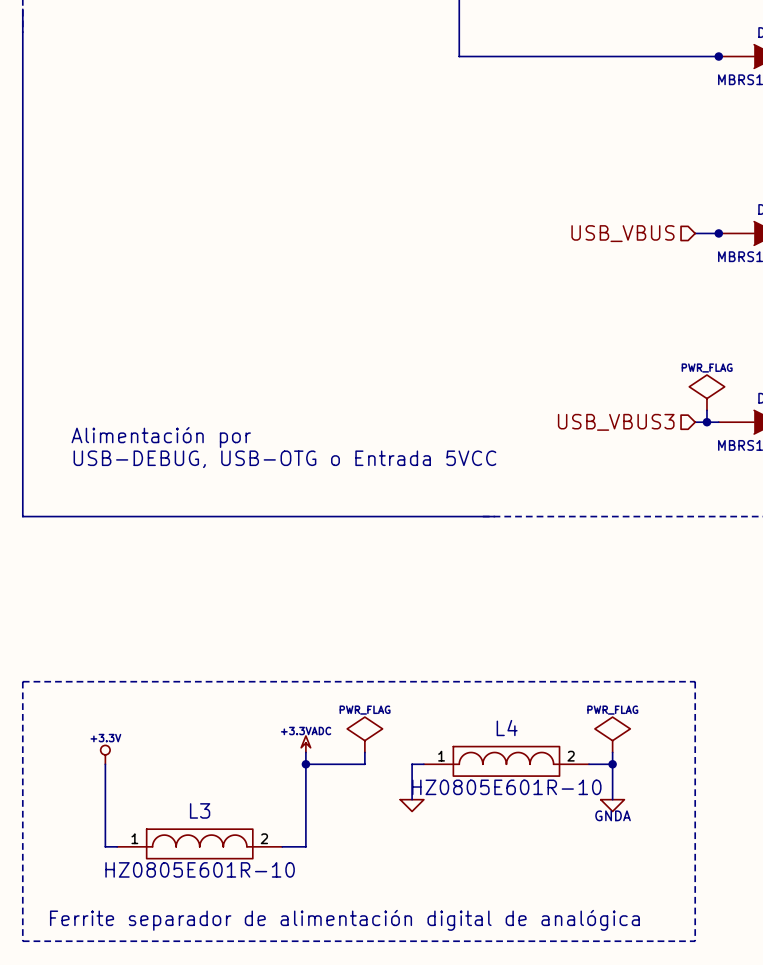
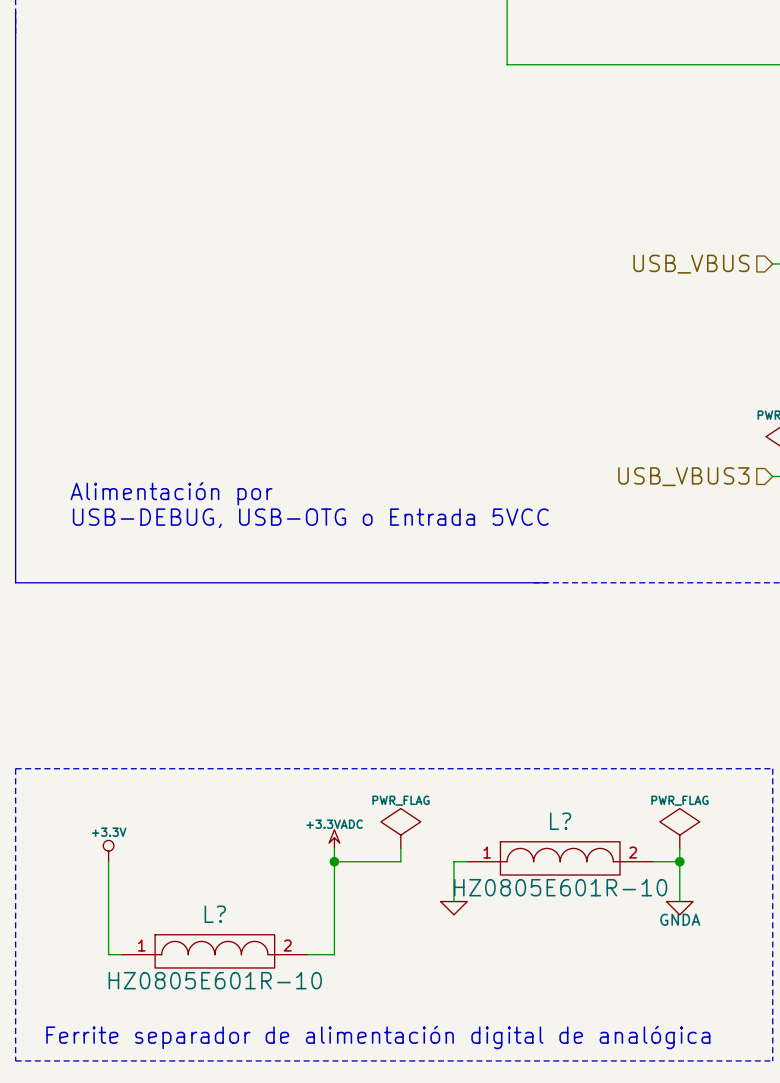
L4 name: L4 (507, 728) -> L? (560, 821)
L3 name: L3 (200, 810) -> L? (215, 914)

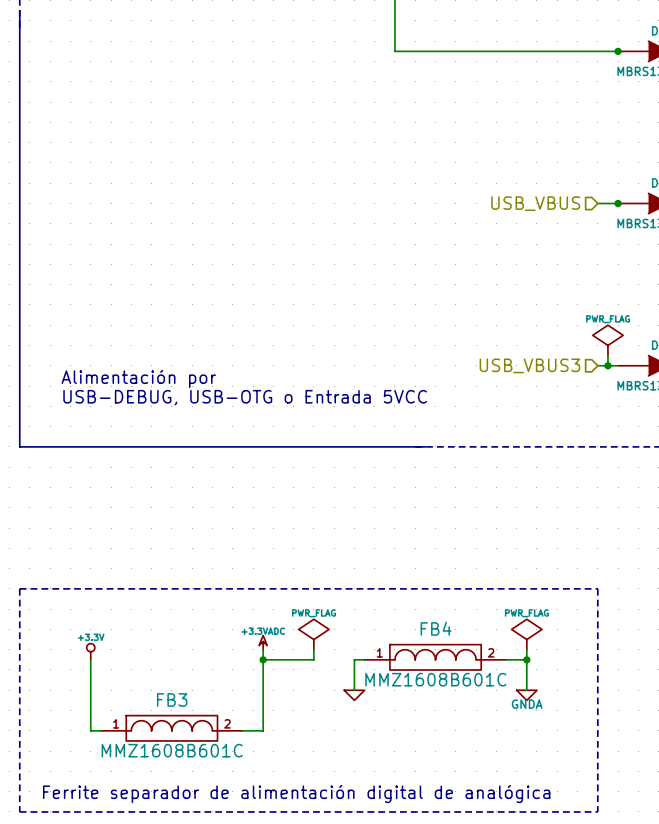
L? name: L? (560, 821) -> FB4 (436, 628)
L? value: HZ0805E601R-10 (560, 887) -> MMZ1608B601C (435, 679)
L? name: L? (215, 914) -> FB3 (172, 699)
L? value: HZ0805E601R-10 (215, 980) -> MMZ1608B601C (172, 750)

